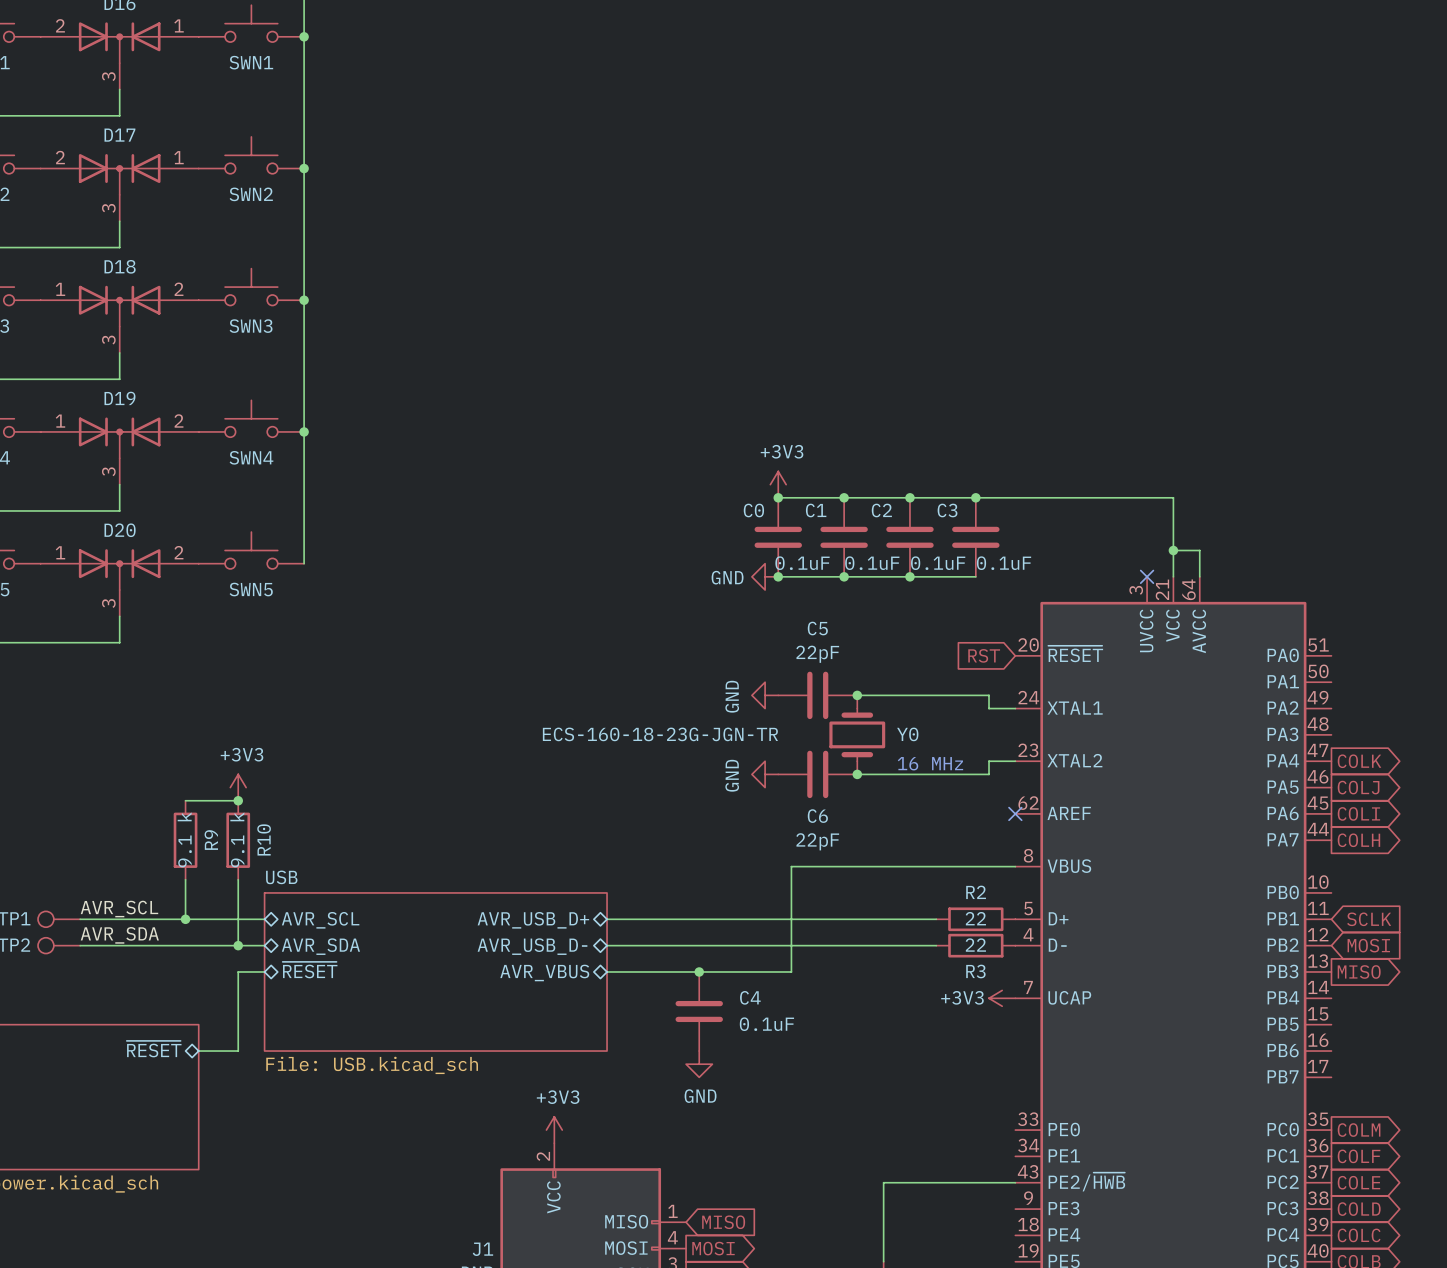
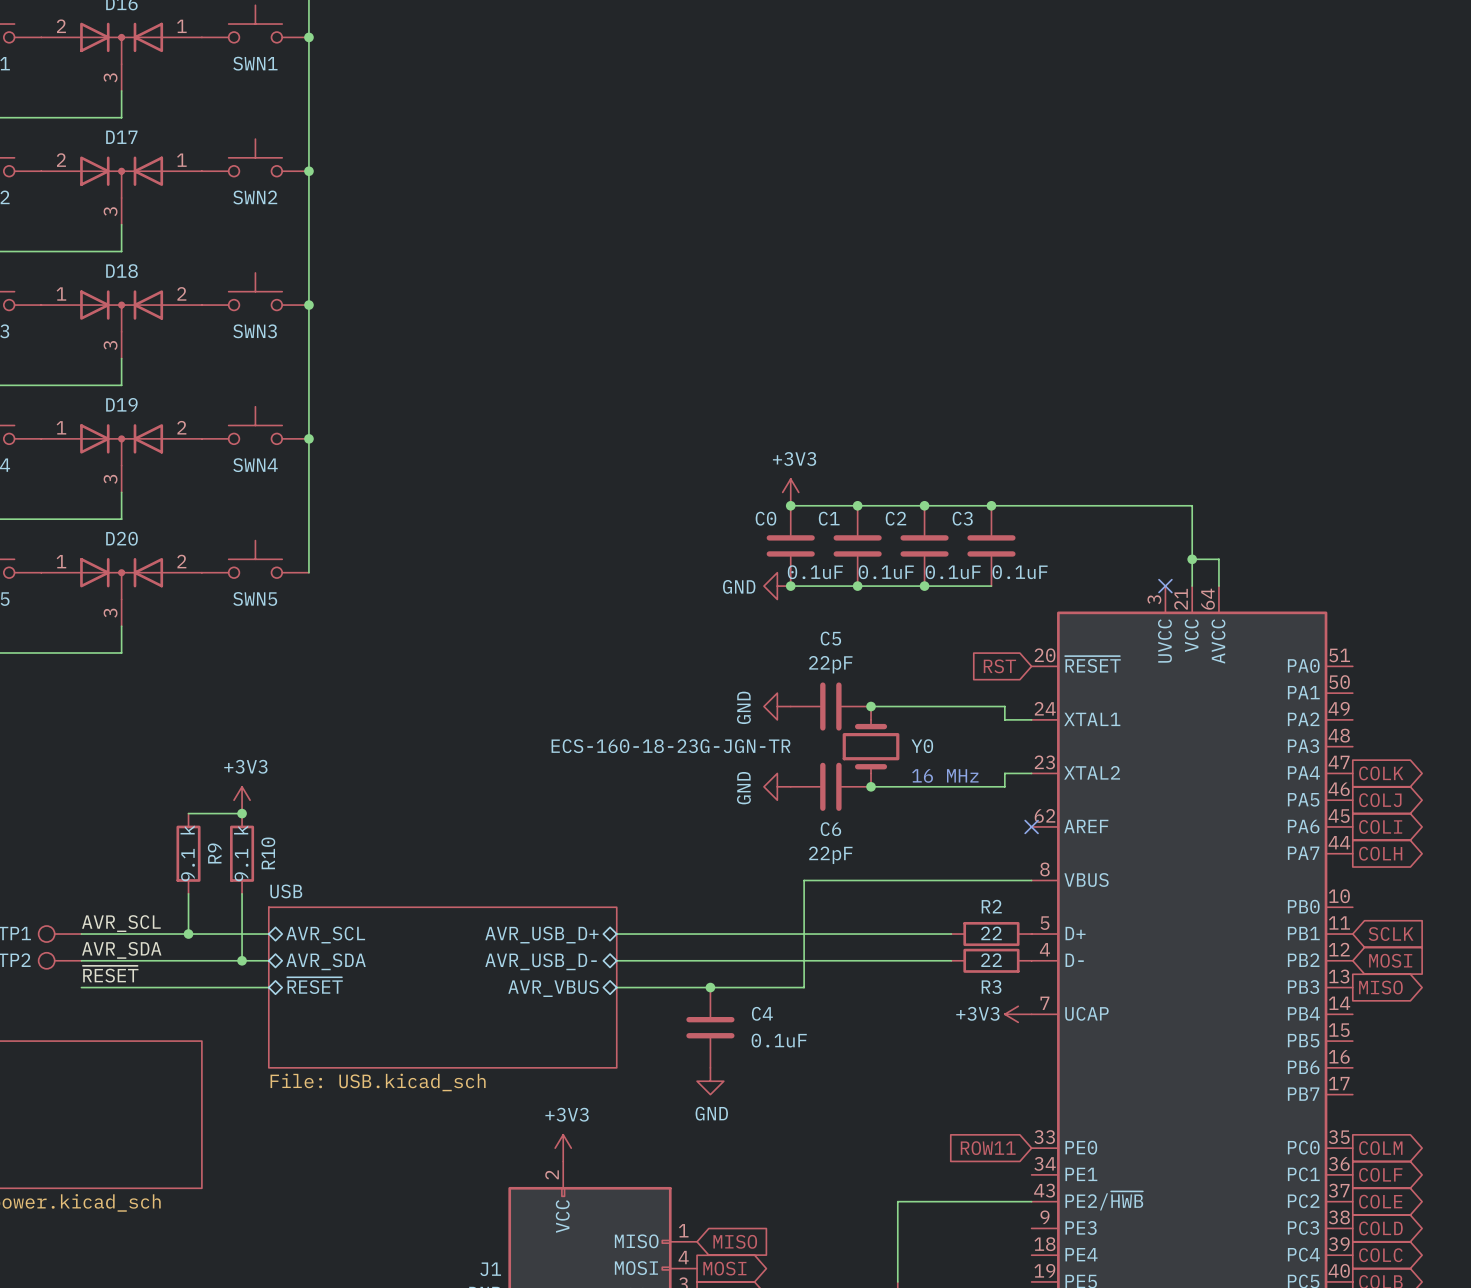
label: none -> ~{RESET} (110, 974)
wire: (238, 971) (238, 1051) (198, 1051) -> (242, 987) (81, 987)
sheet pin: ~{RESET} (154, 1049) -> none
global label: none -> ROW11 (988, 1148)

